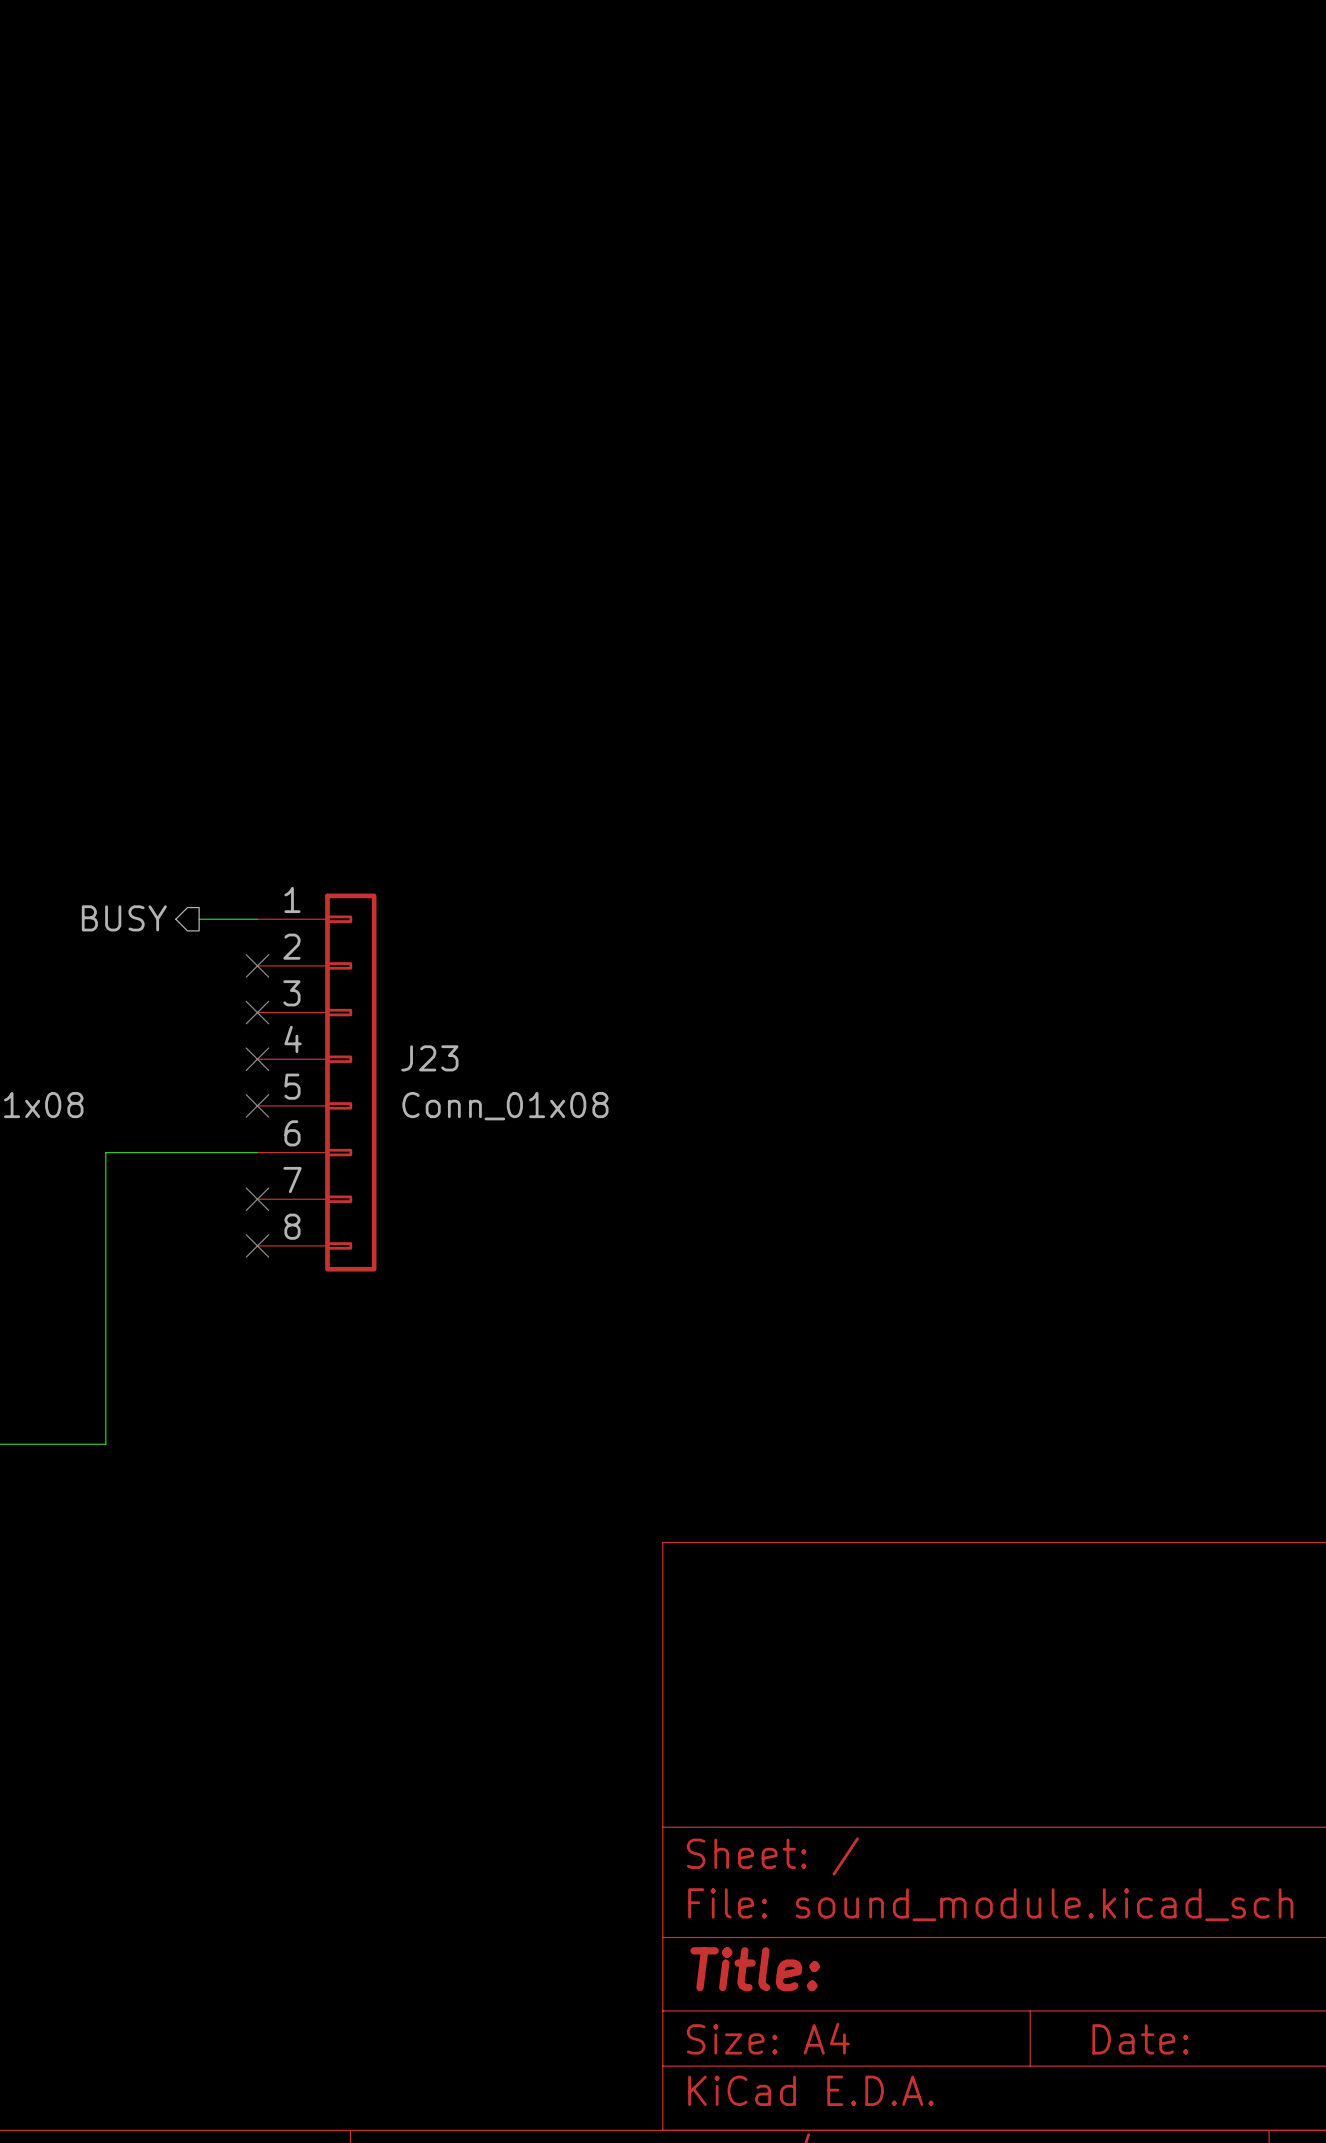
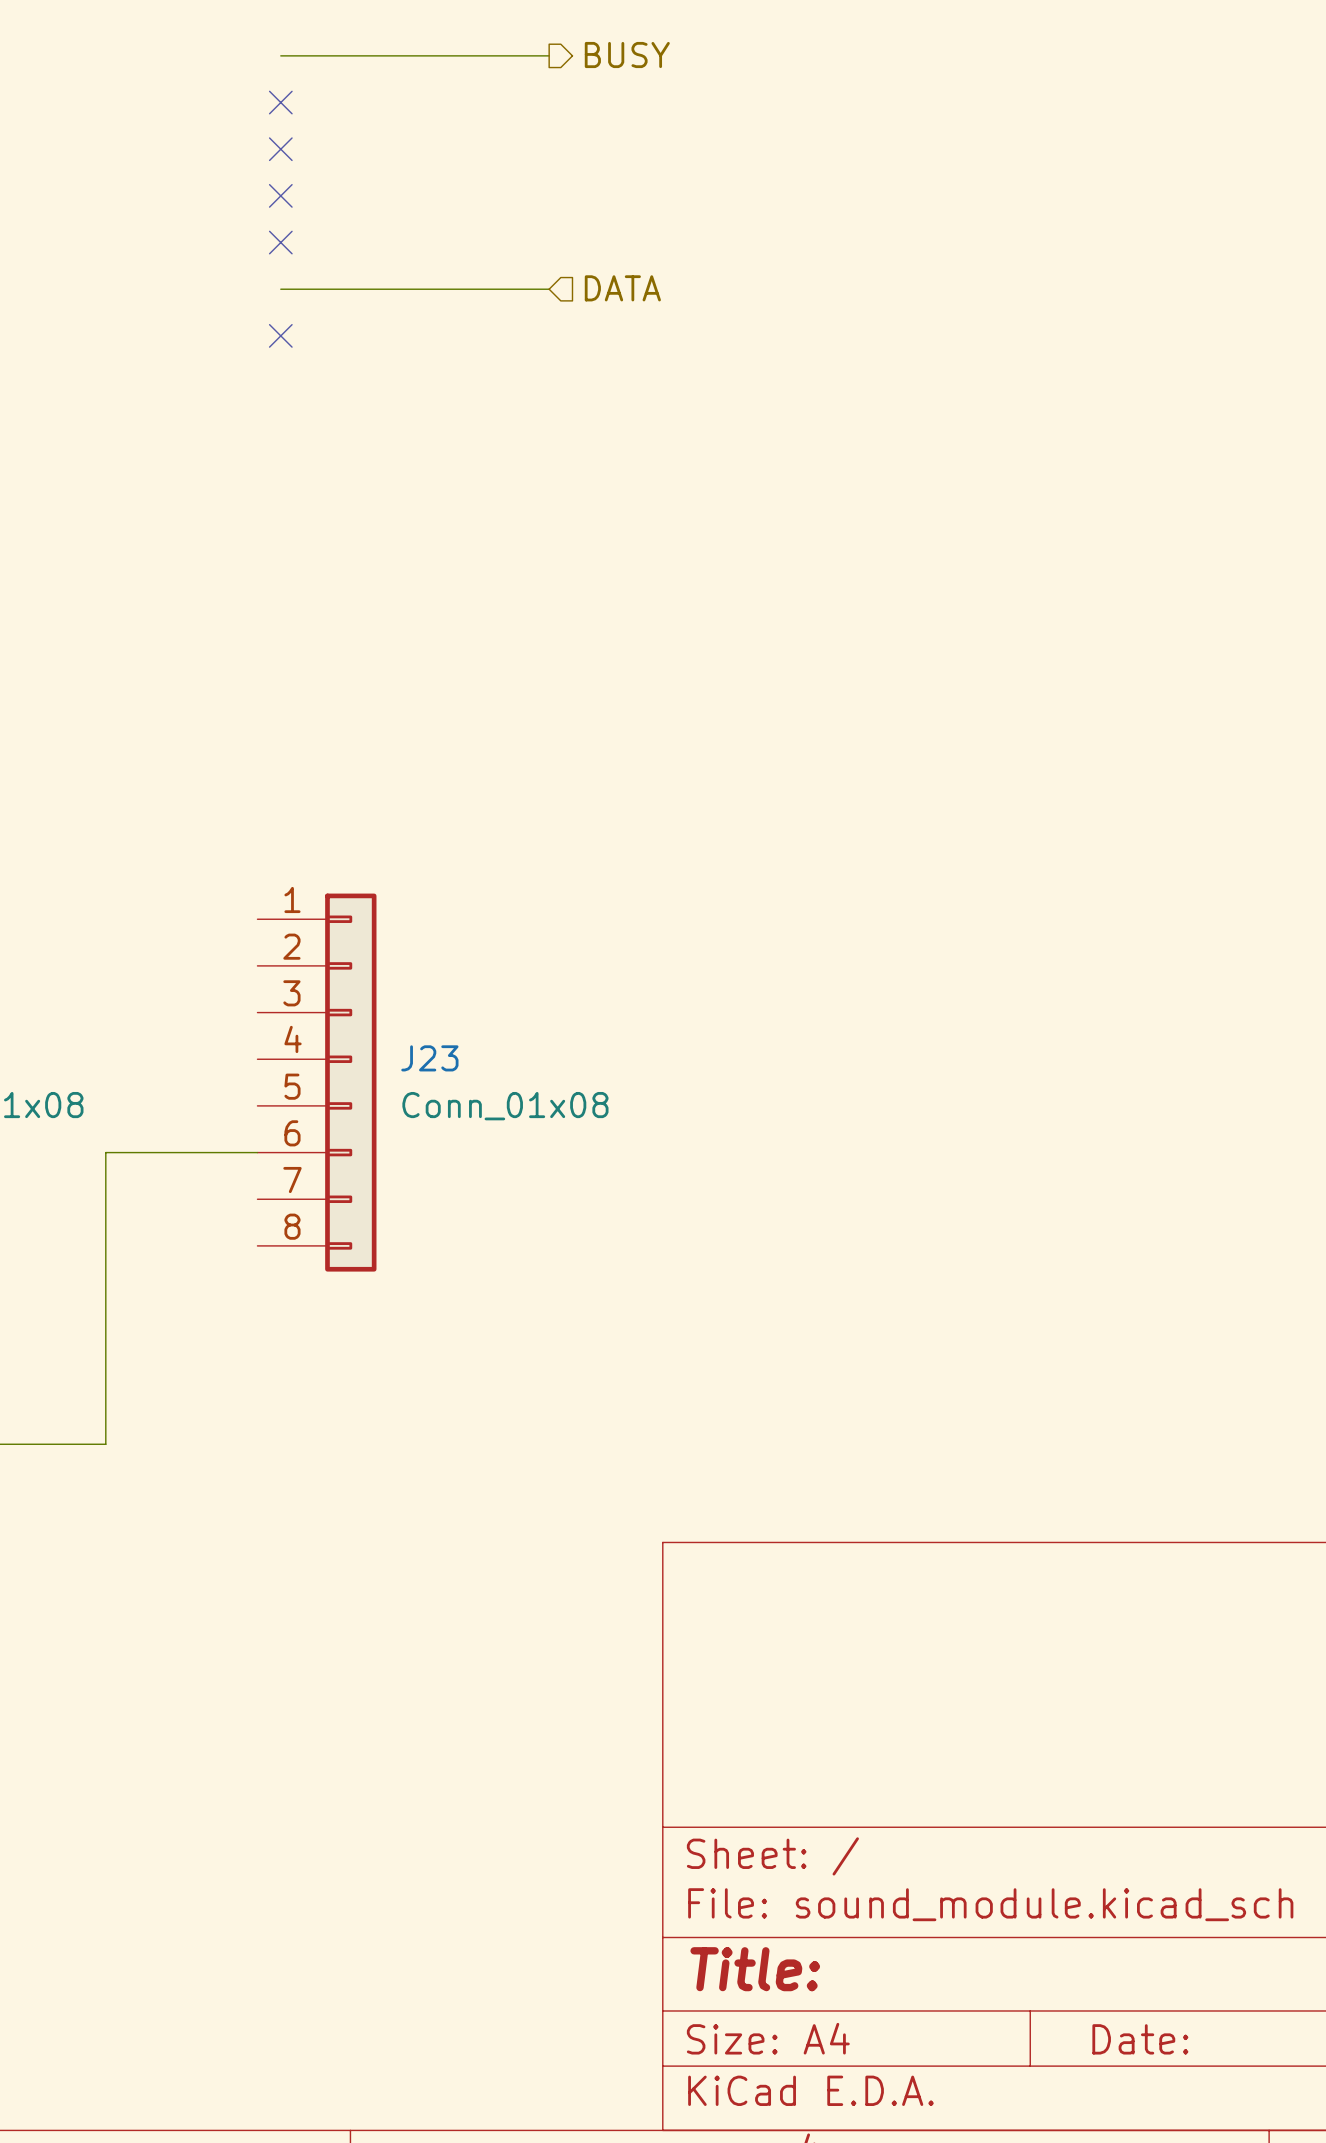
wire: none -> (280, 55) (549, 55)
hierarchical label: none -> BUSY (627, 55)
no-connect mark: none -> (280, 102)
no-connect mark: none -> (280, 149)
no-connect mark: none -> (280, 195)
no-connect mark: none -> (280, 242)
hierarchical label: none -> DATA (622, 288)
wire: none -> (280, 289) (549, 289)
no-connect mark: none -> (280, 335)
hierarchical label: BUSY (124, 918) -> none
wire: (199, 919) (257, 919) -> none
no-connect mark: (257, 965) -> none
no-connect mark: (257, 1012) -> none
no-connect mark: (257, 1059) -> none
no-connect mark: (257, 1105) -> none
no-connect mark: (257, 1199) -> none
no-connect mark: (257, 1245) -> none

